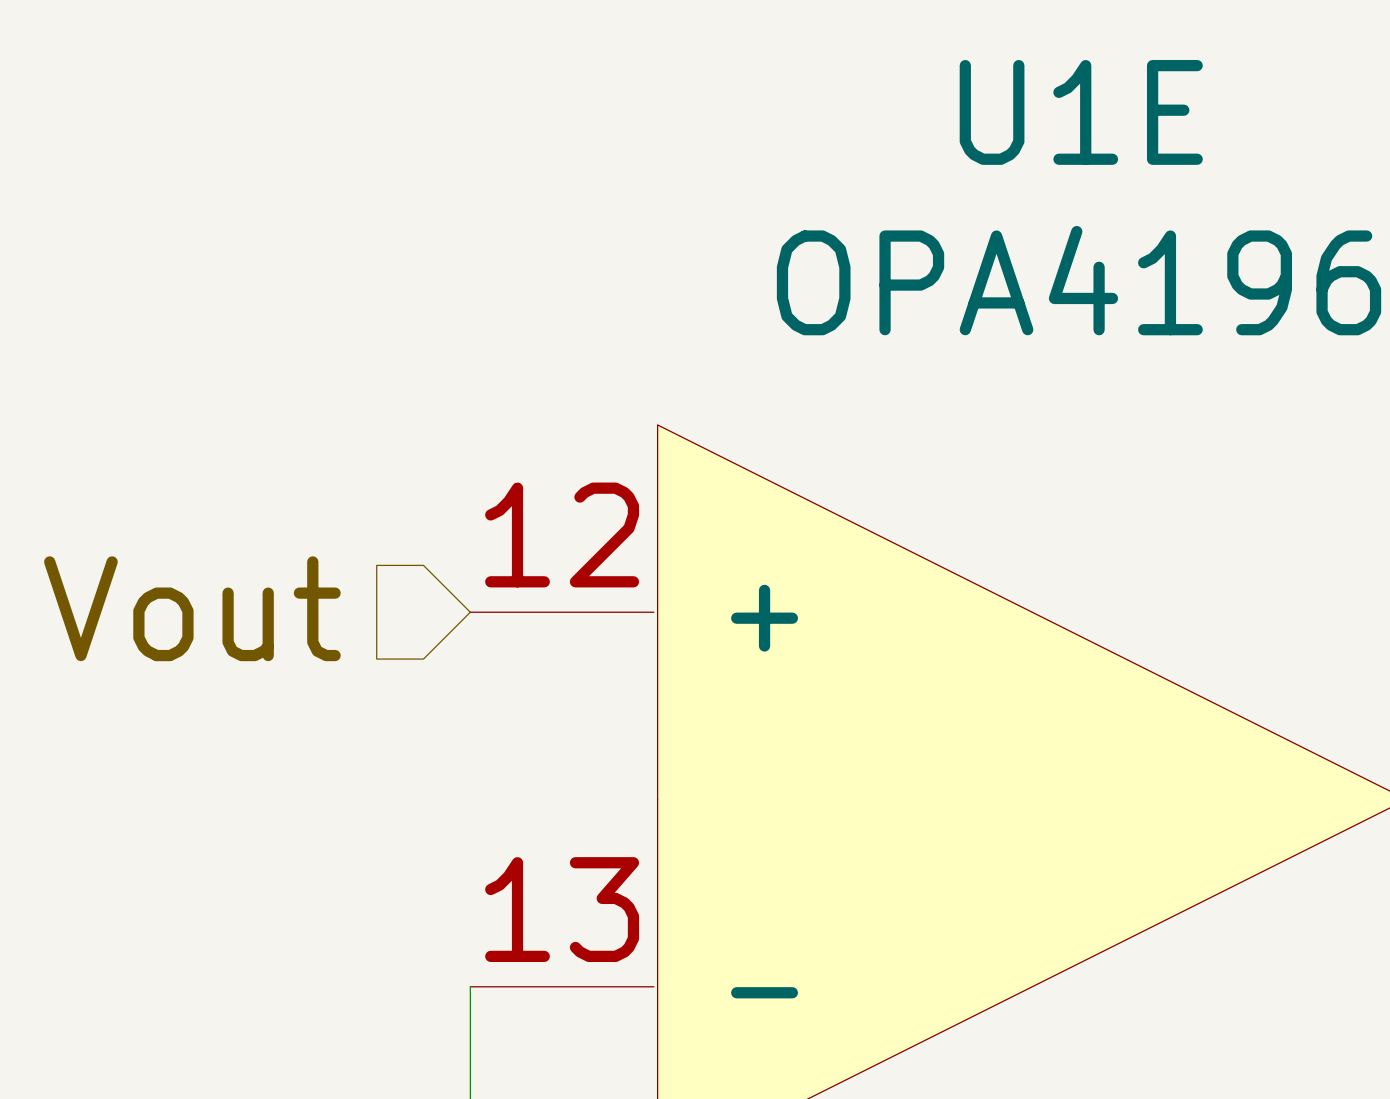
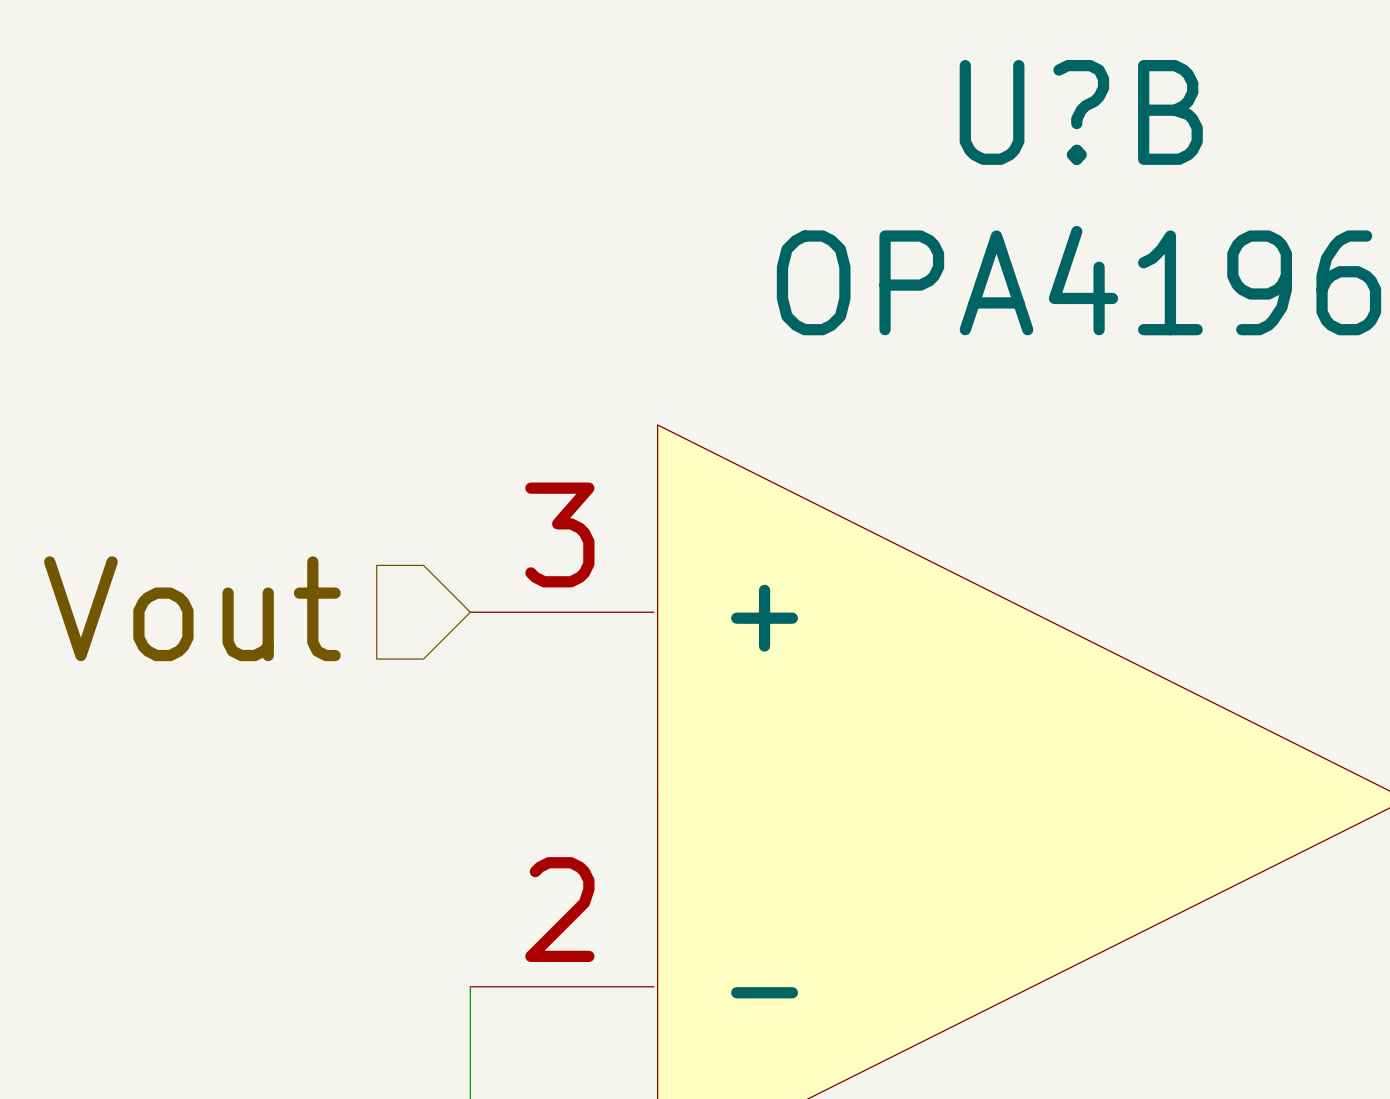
U1E name: U1E (1081, 112) -> U?B (1081, 112)
U1E pin number: 12 (562, 534) -> 3 (559, 534)
U1E pin number: 13 (562, 909) -> 2 (559, 909)

